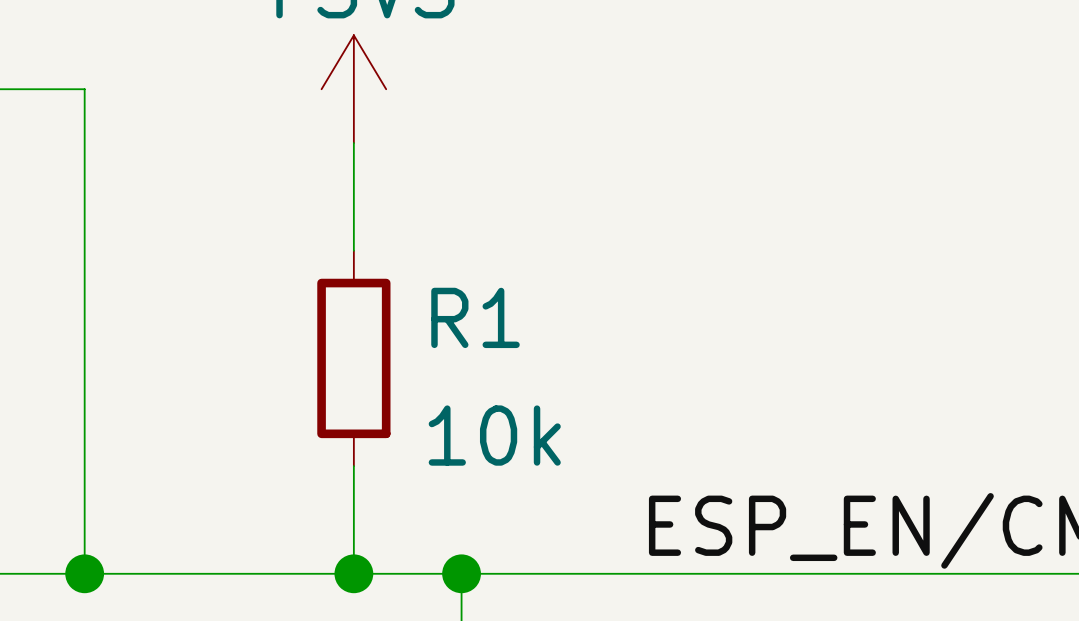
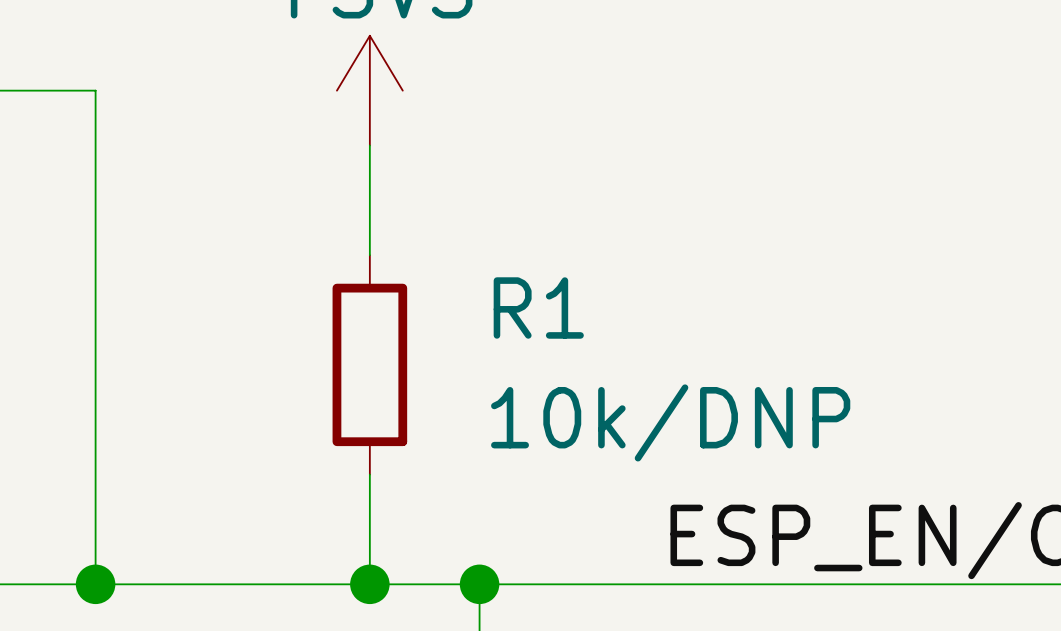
R1 name position: R1 (475, 317) -> R1 (538, 308)
R1 value: 10k (494, 435) -> 10k/DNP (670, 422)

